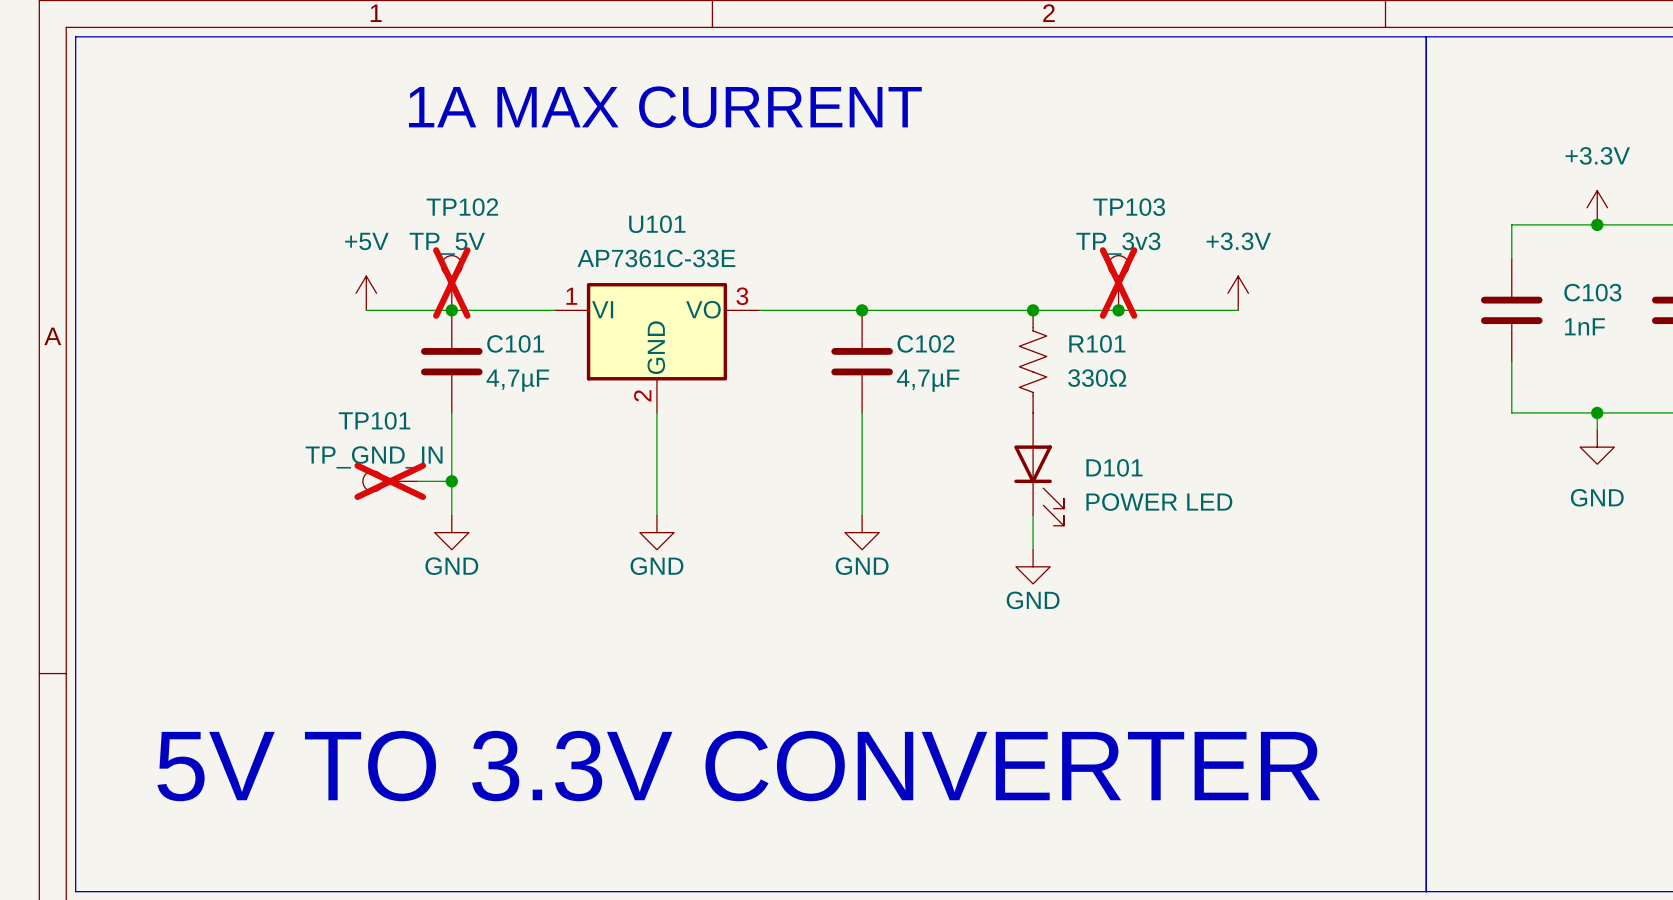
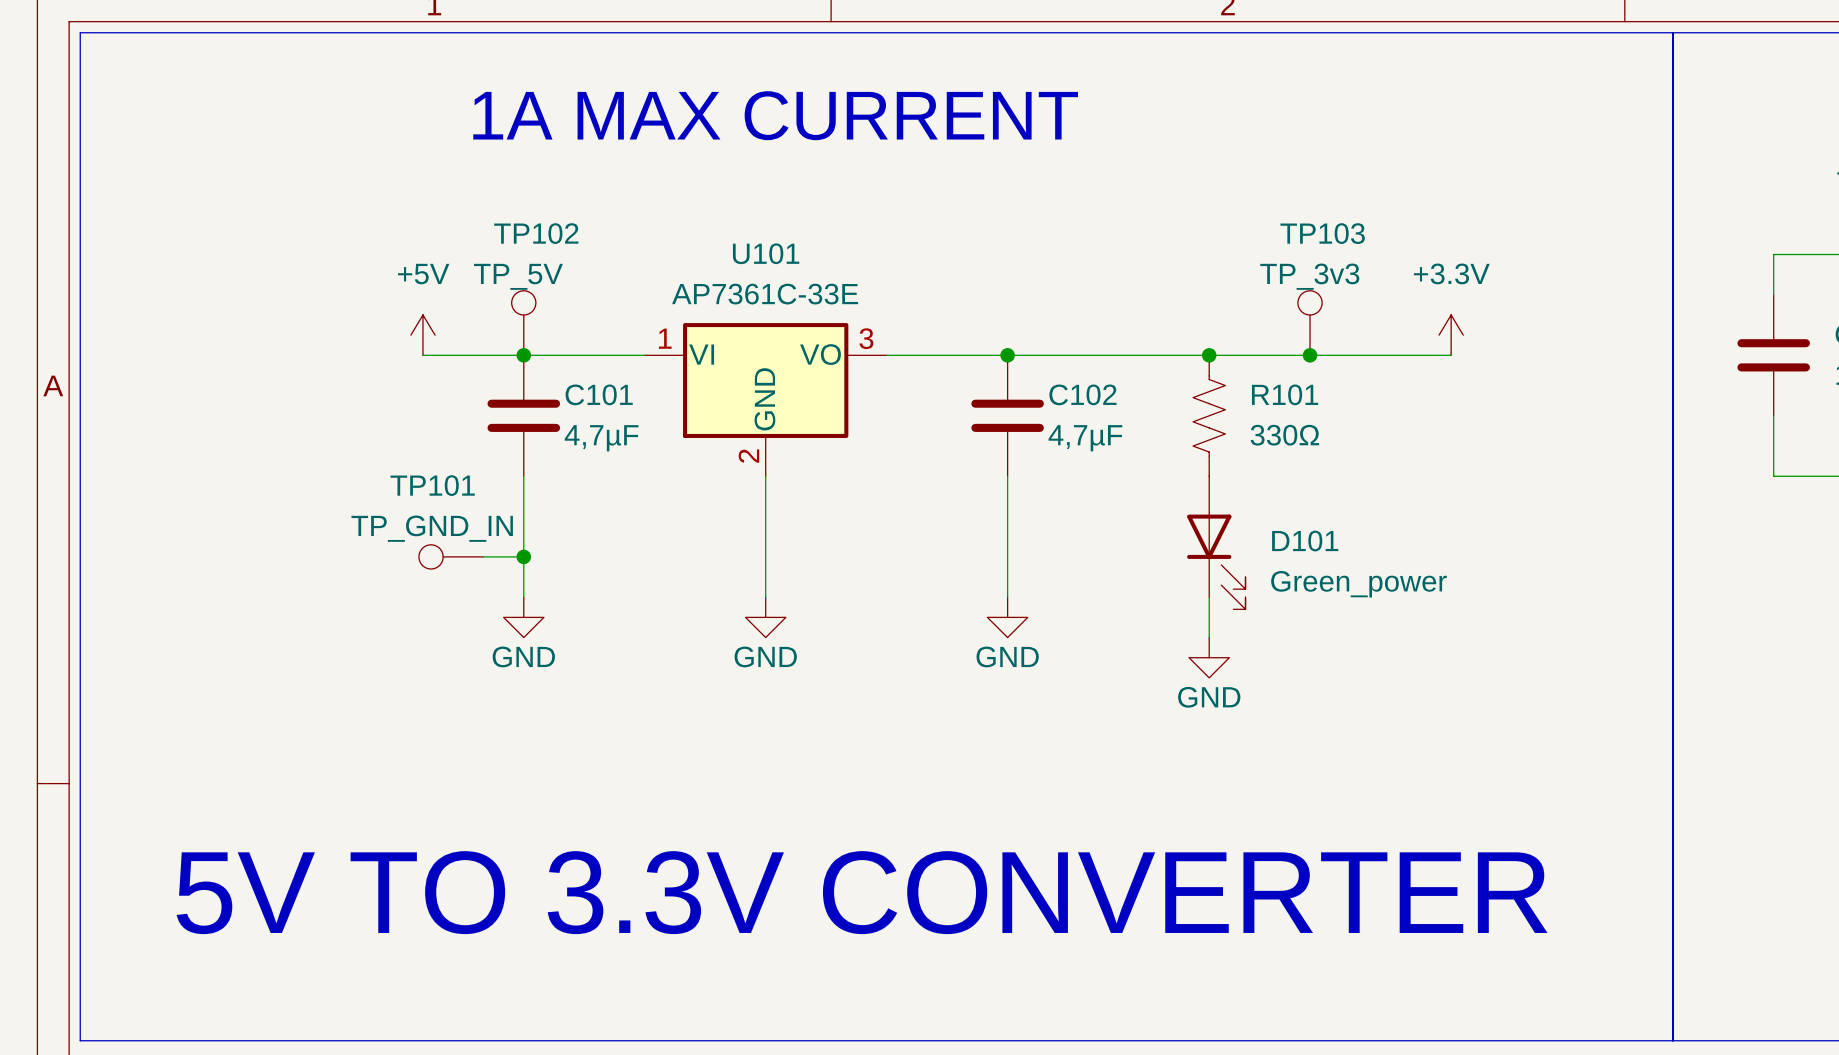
TP102 do-not-place cross: (451, 283) -> none
TP103 do-not-place cross: (1118, 283) -> none
TP101 do-not-place cross: (390, 481) -> none
D101 value: POWER LED (1159, 502) -> Green_power (1358, 584)

